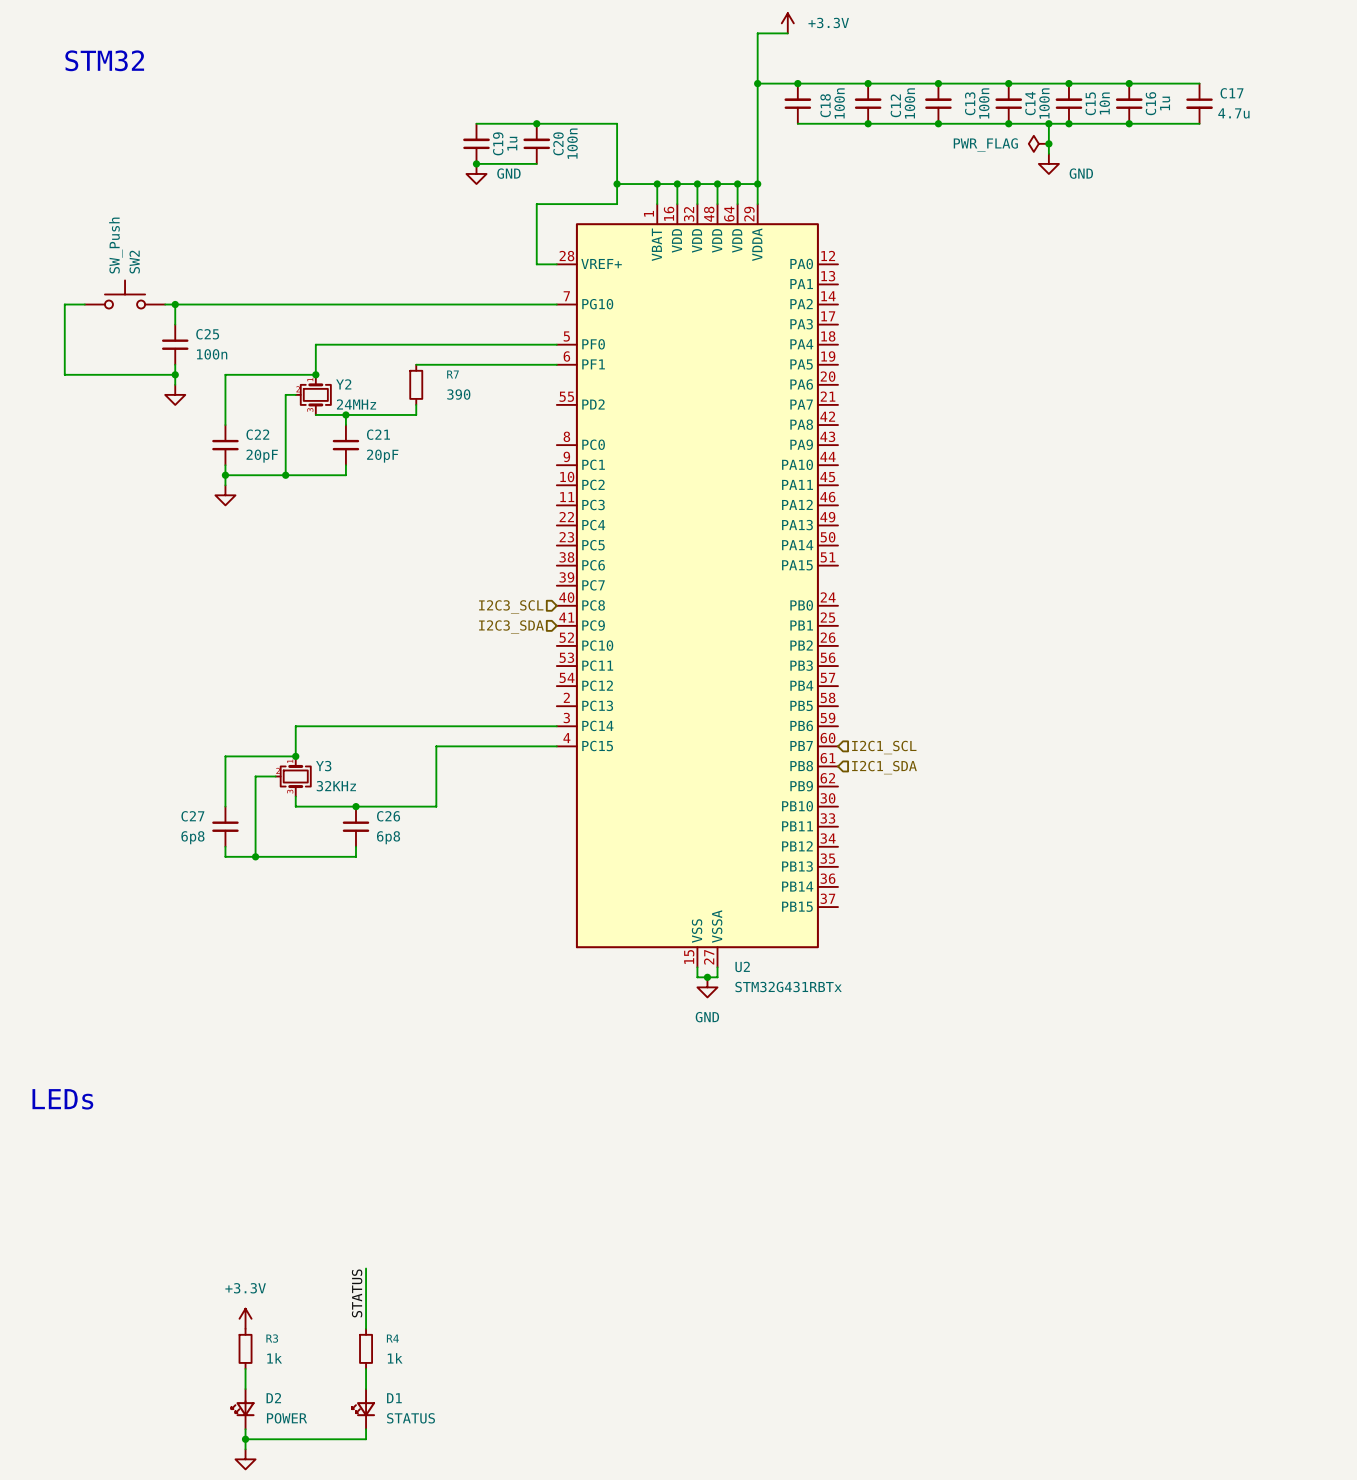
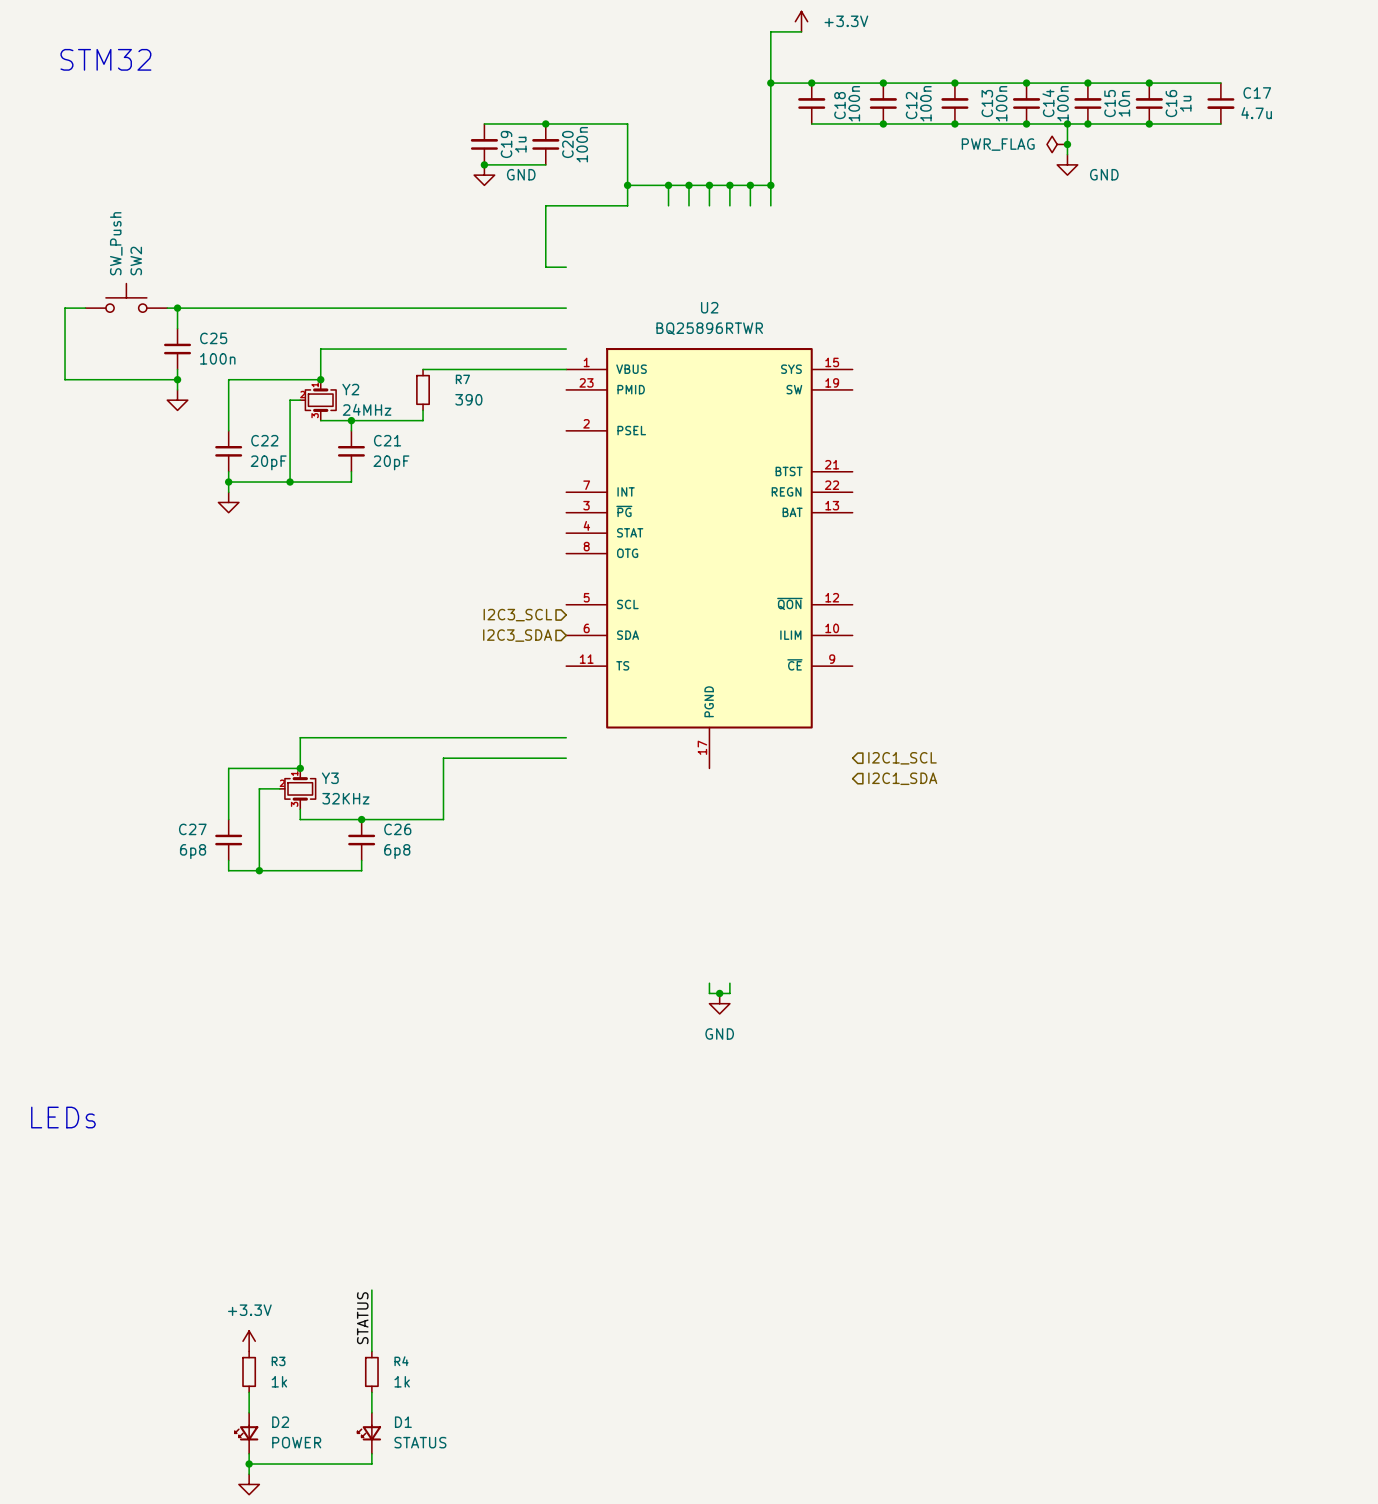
U2 symbol: [556, 204, 839, 968] -> [566, 348, 853, 769]
U2 name position: U2 (742, 966) -> U2 (709, 307)
U2 value: STM32G431RBTx (788, 987) -> BQ25896RTWR (709, 328)

